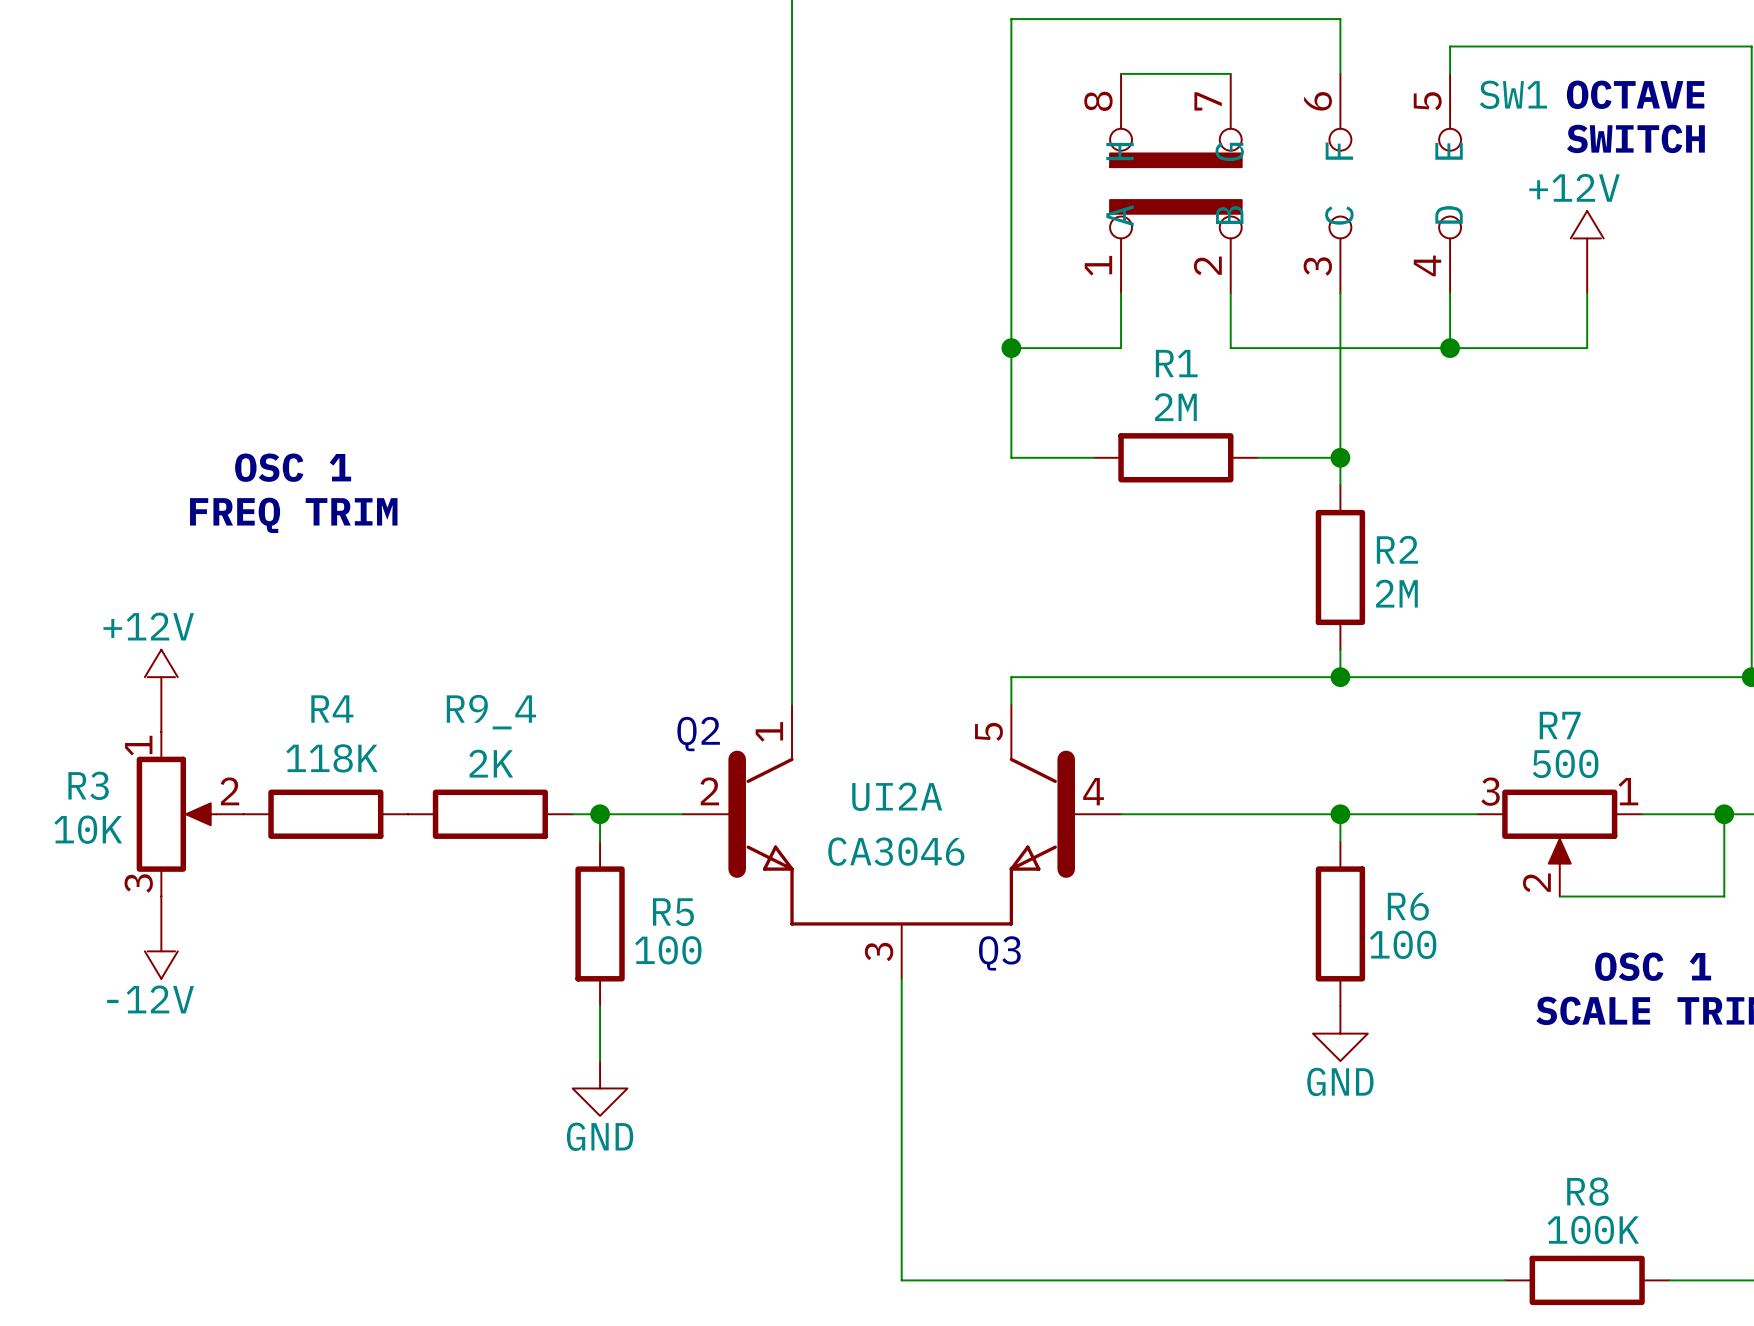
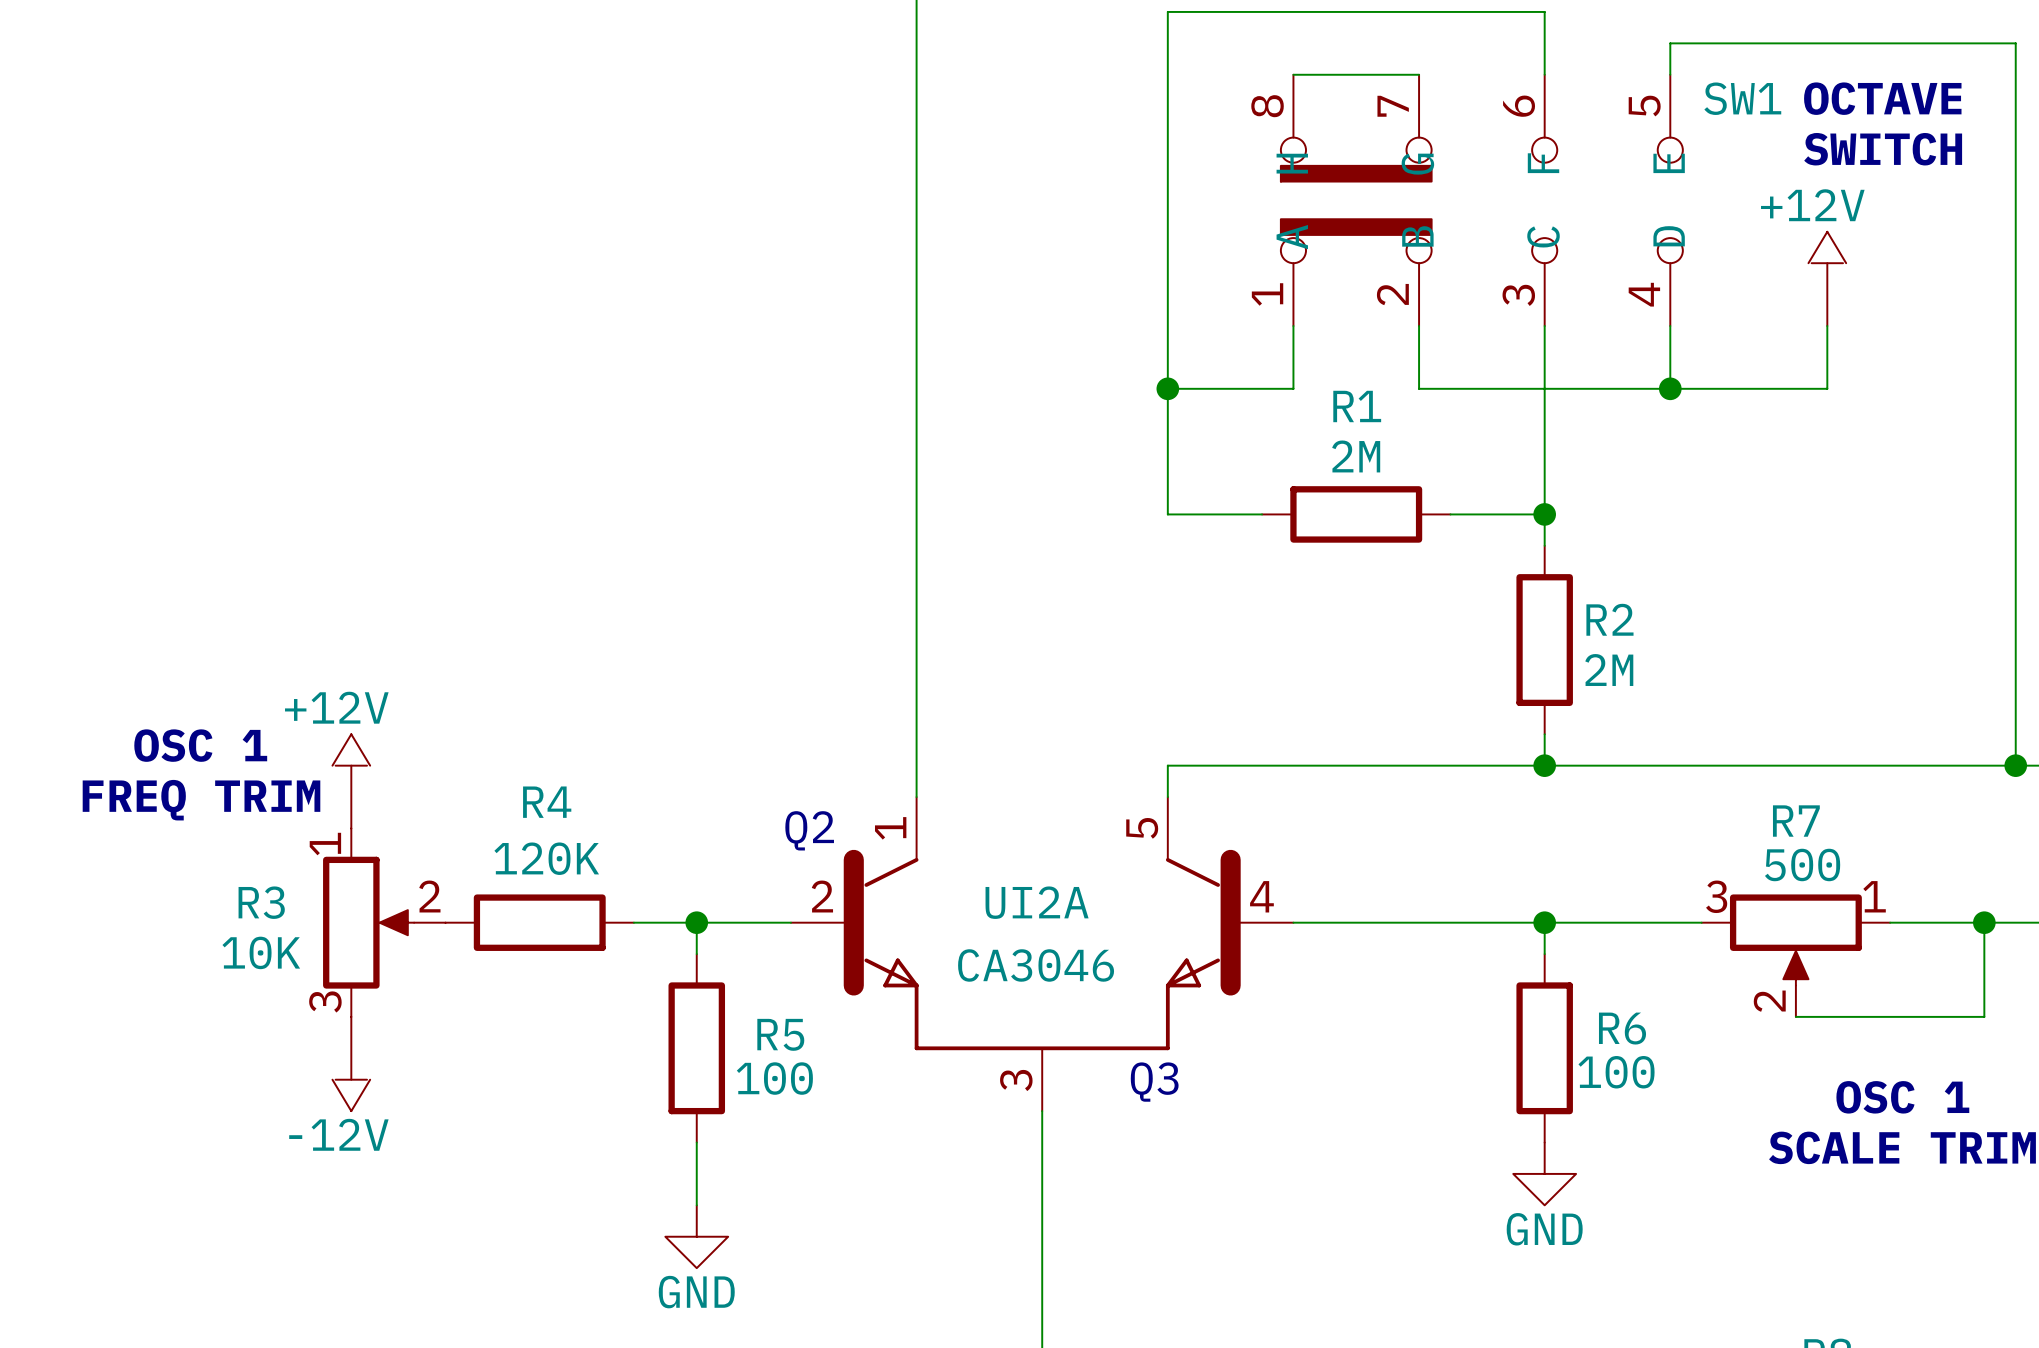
text position: OSC 1 (293, 467) -> OSC 1 (200, 745)
text position: FREQ TRIM (293, 515) -> FREQ TRIM (201, 800)
part position: (161, 690) -> (351, 781)
R4 value: 118K (331, 758) -> 120K (546, 858)
R3 name position: R3 (88, 785) -> R3 (261, 902)
R3 position: (190, 814) -> (384, 922)
R4 position: (325, 814) -> (539, 922)
R9_4: 2K (490, 814) -> none
R3 value position: 10K (88, 829) -> 10K (261, 952)
part position: (161, 937) -> (351, 1064)

